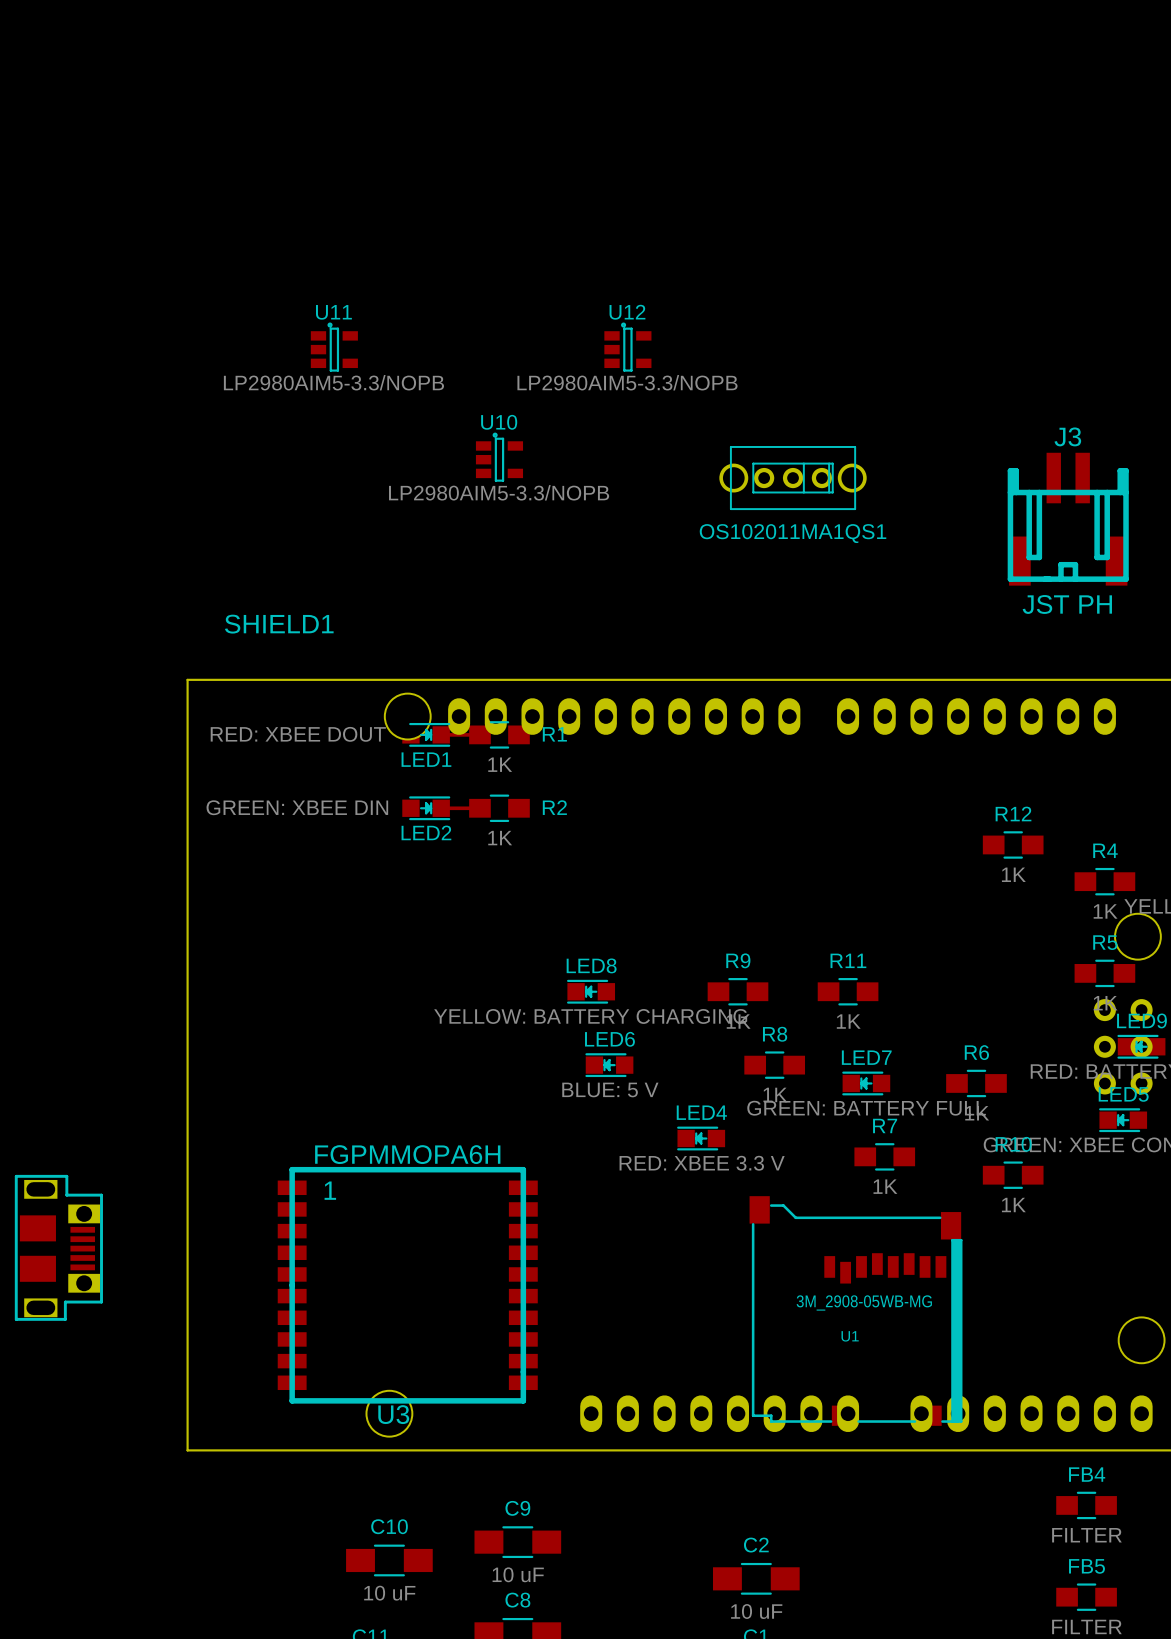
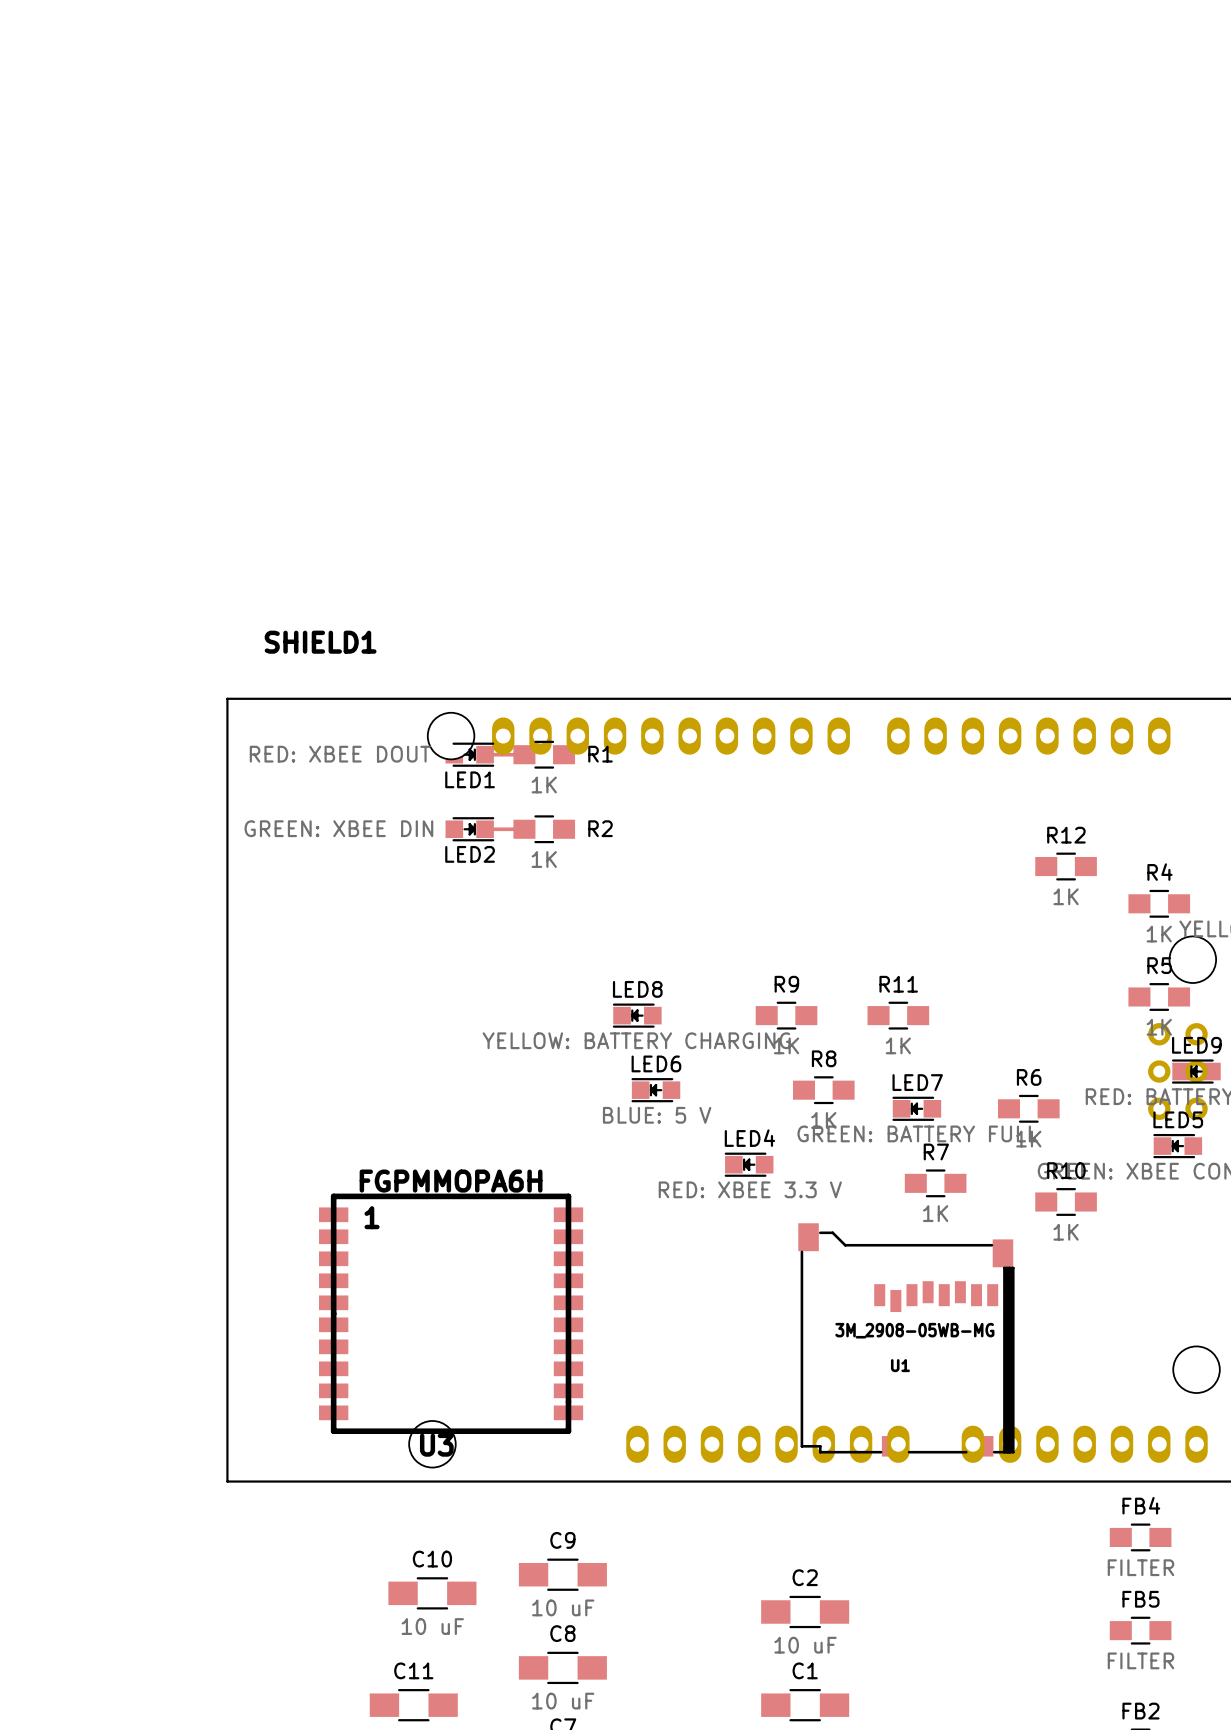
U11: LP2980AIM5-3.3/NOPB (334, 347) -> none
U12: LP2980AIM5-3.3/NOPB (627, 347) -> none
U10: LP2980AIM5-3.3/NOPB (499, 457) -> none
part: OS102011MA1QS1 (793, 478) -> none
J3: JST PH (1068, 519) -> none
part: (58, 1247) -> none

